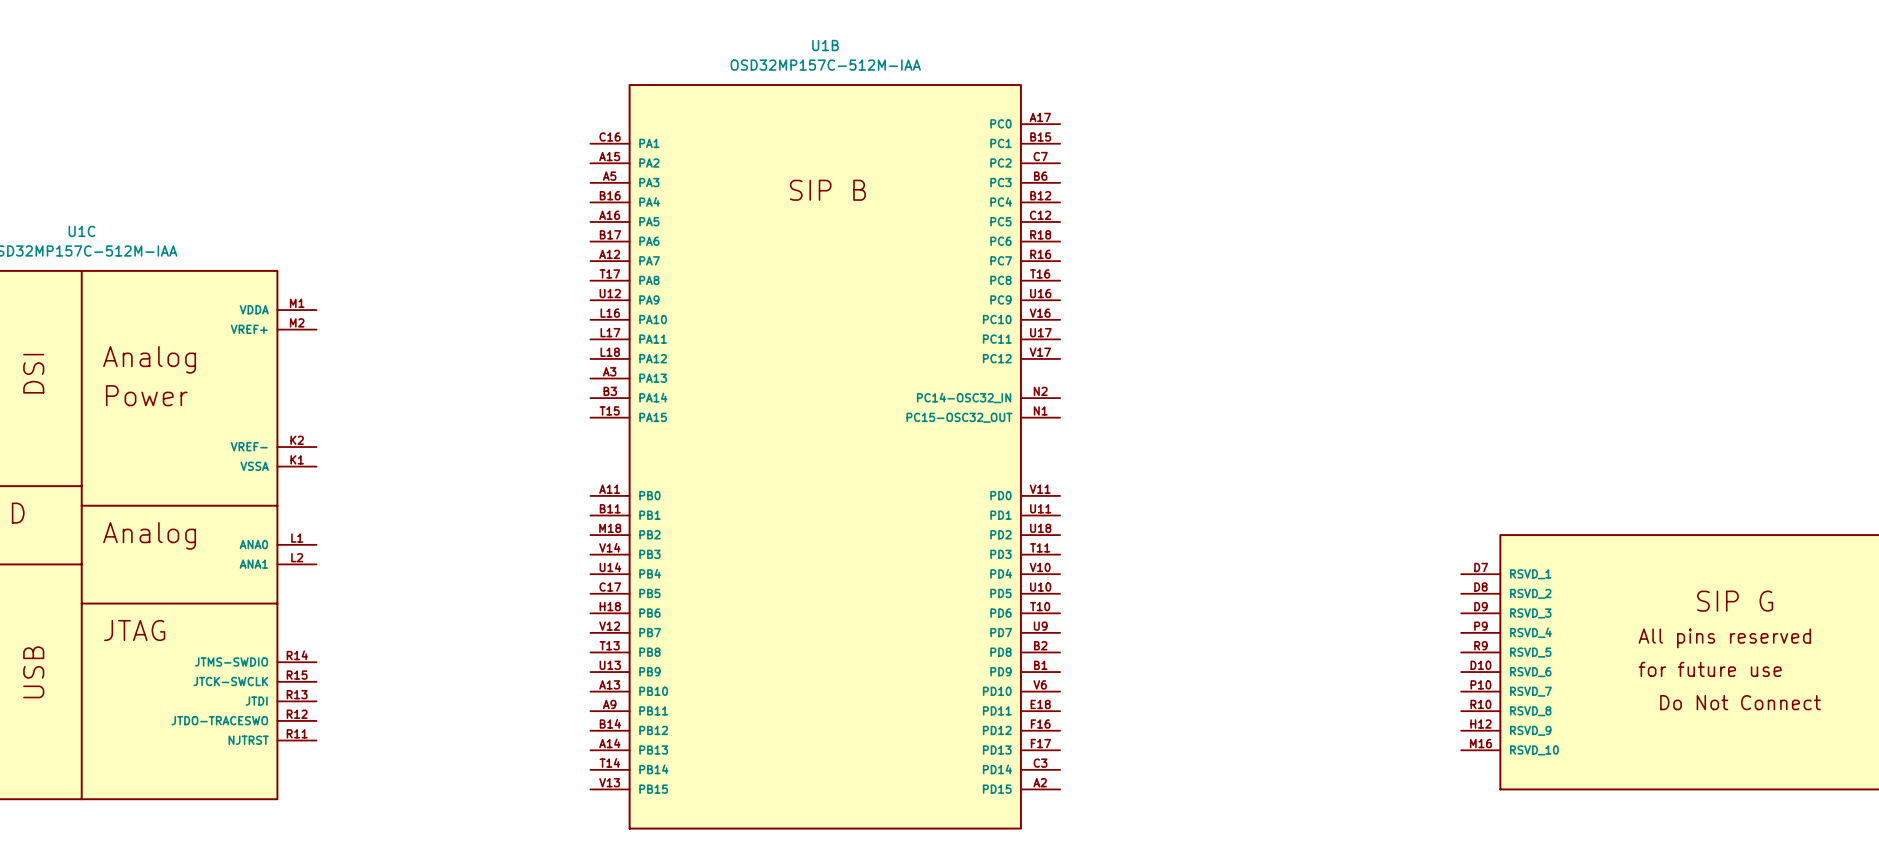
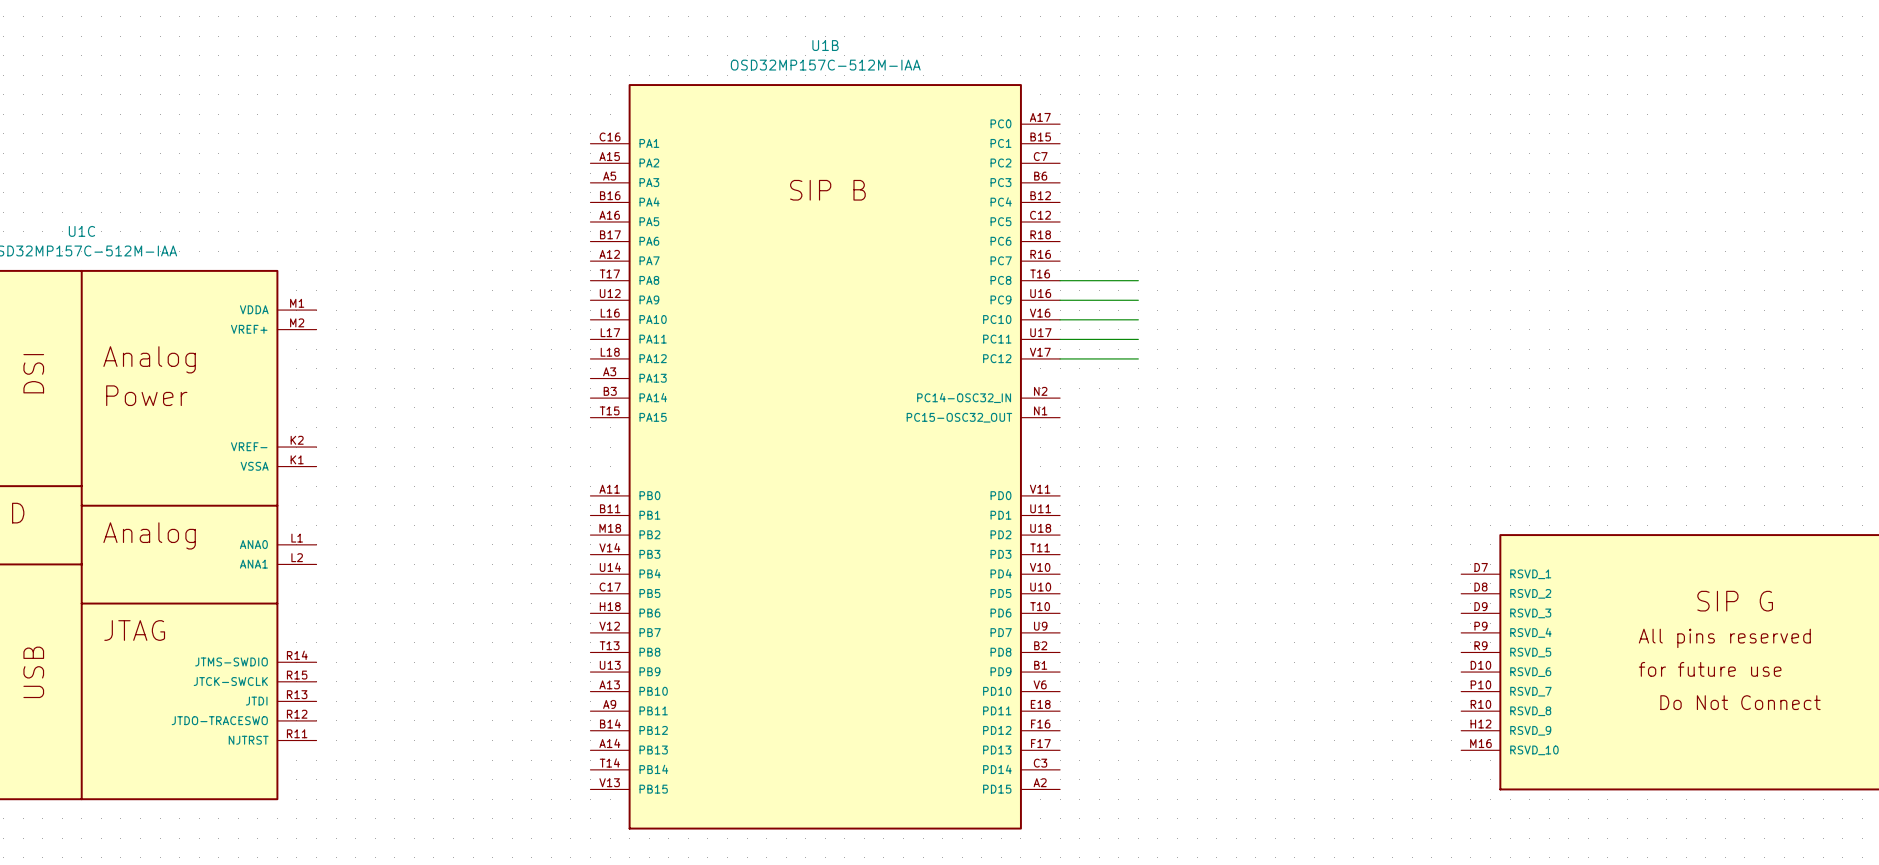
wire: none -> (1060, 280) (1138, 280)
wire: none -> (1060, 300) (1138, 300)
wire: none -> (1060, 319) (1138, 319)
wire: none -> (1060, 339) (1138, 339)
wire: none -> (1060, 358) (1138, 358)

